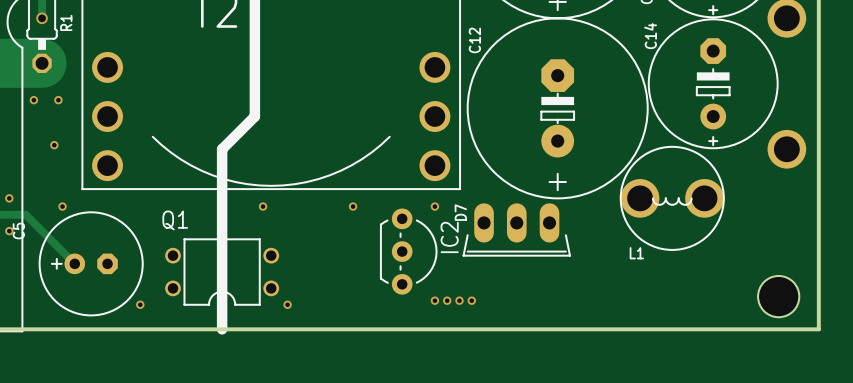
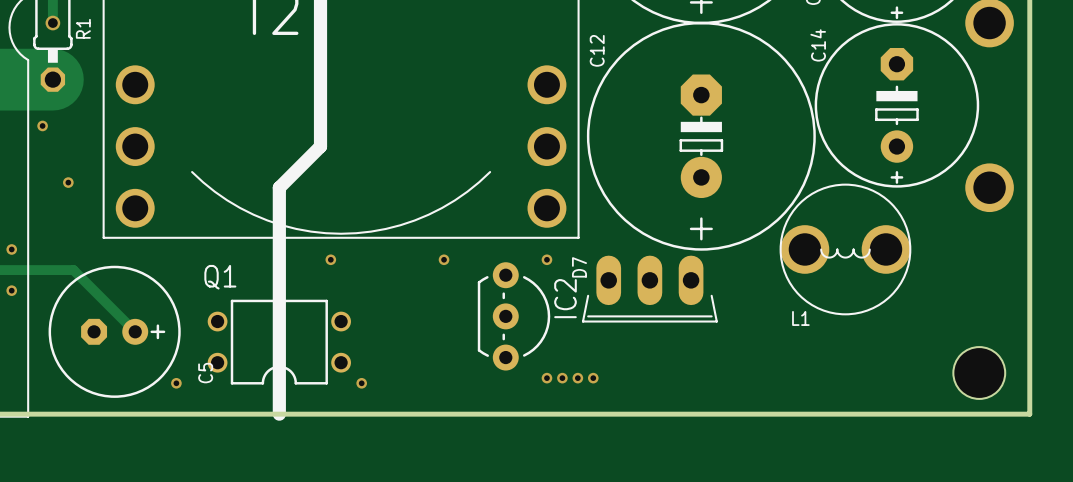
via: (58, 100) -> none
via: (62, 206) -> none
track: (25, 214) (74, 263) -> (32, 270) (73, 270) (135, 331)
C5 rotation: 0° (91, 263) -> 180° (114, 331)

